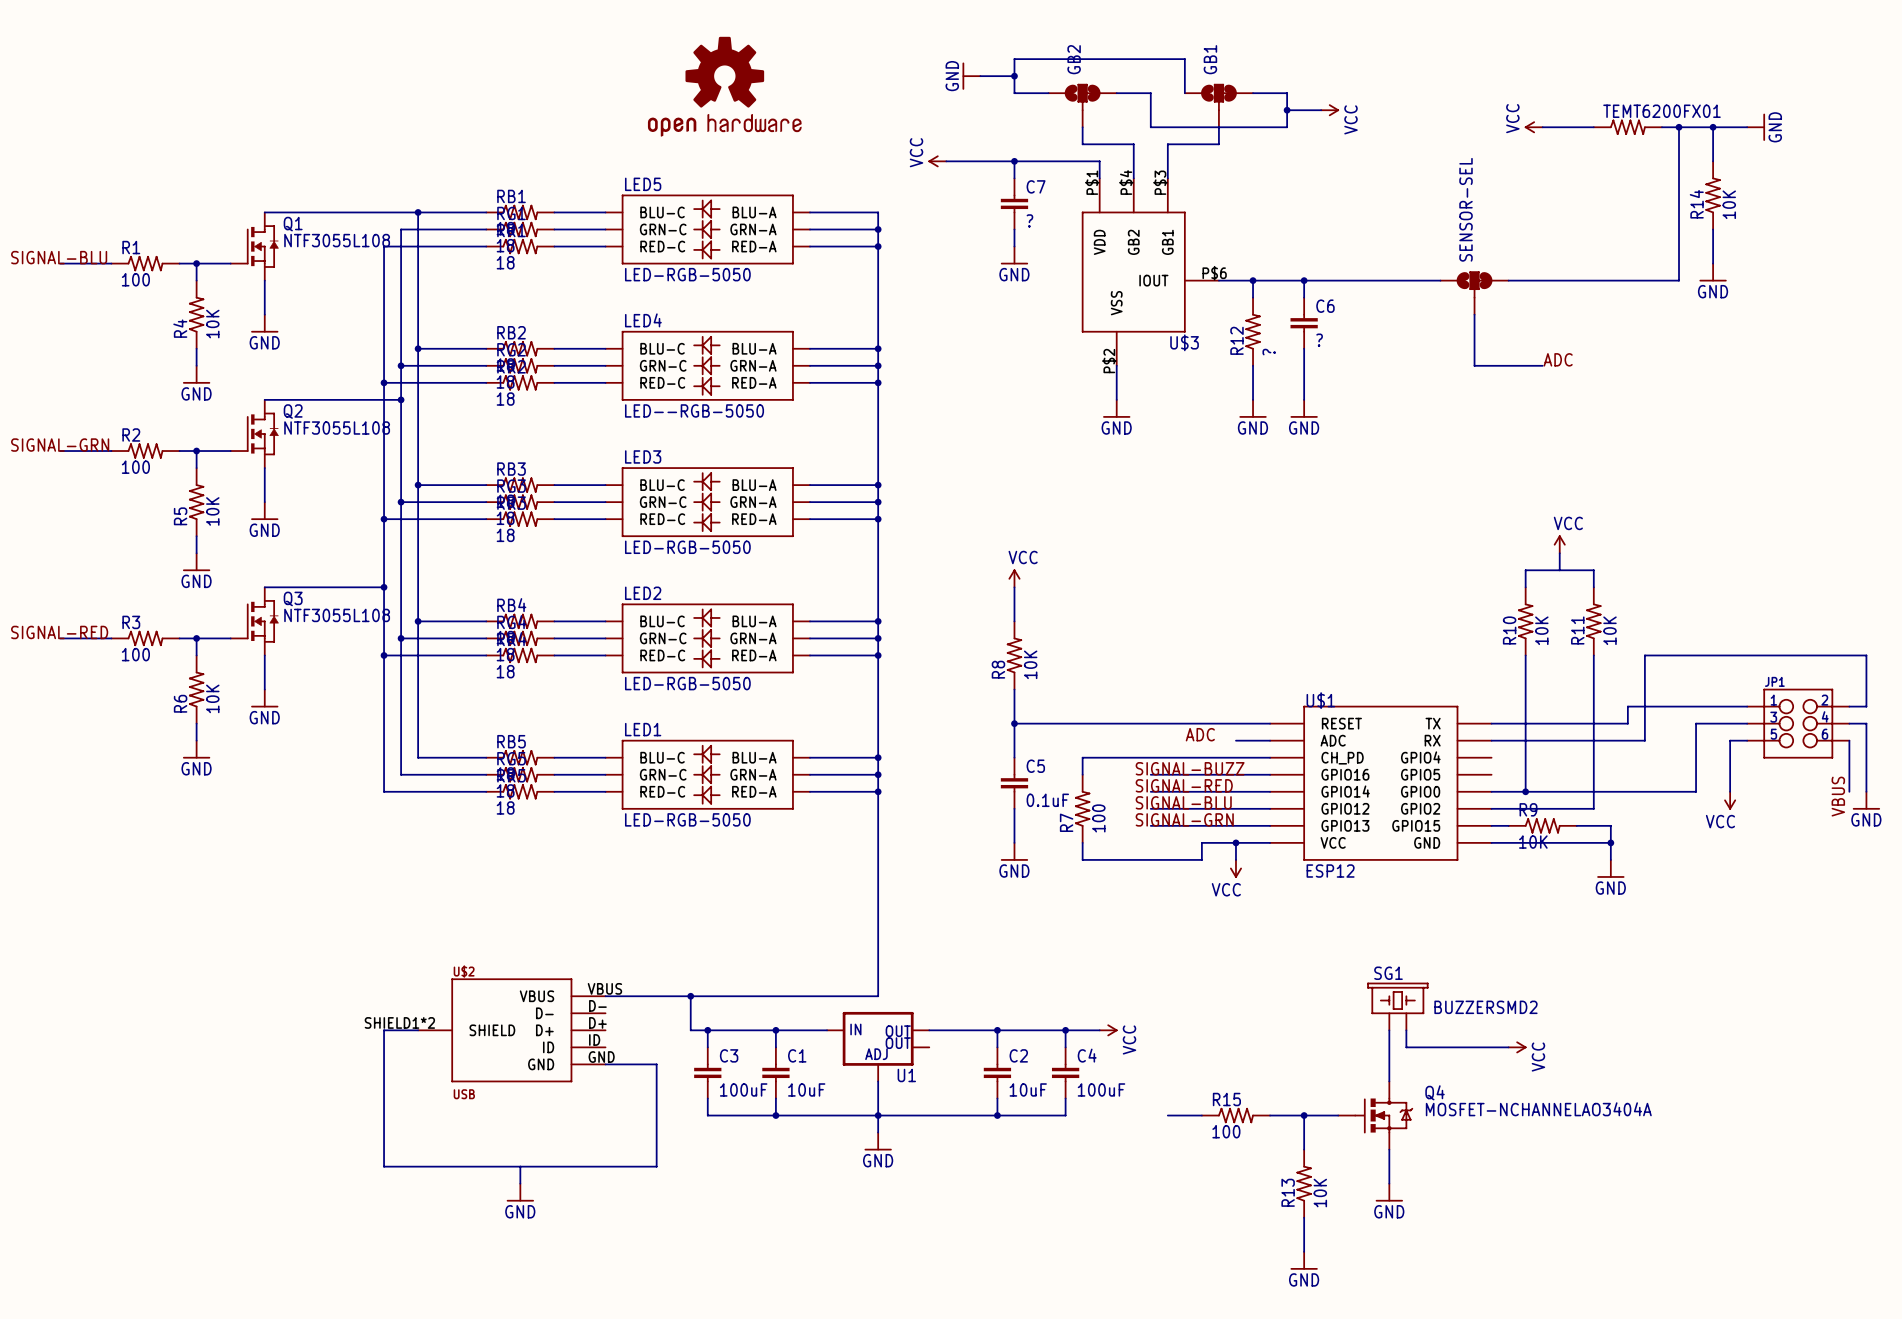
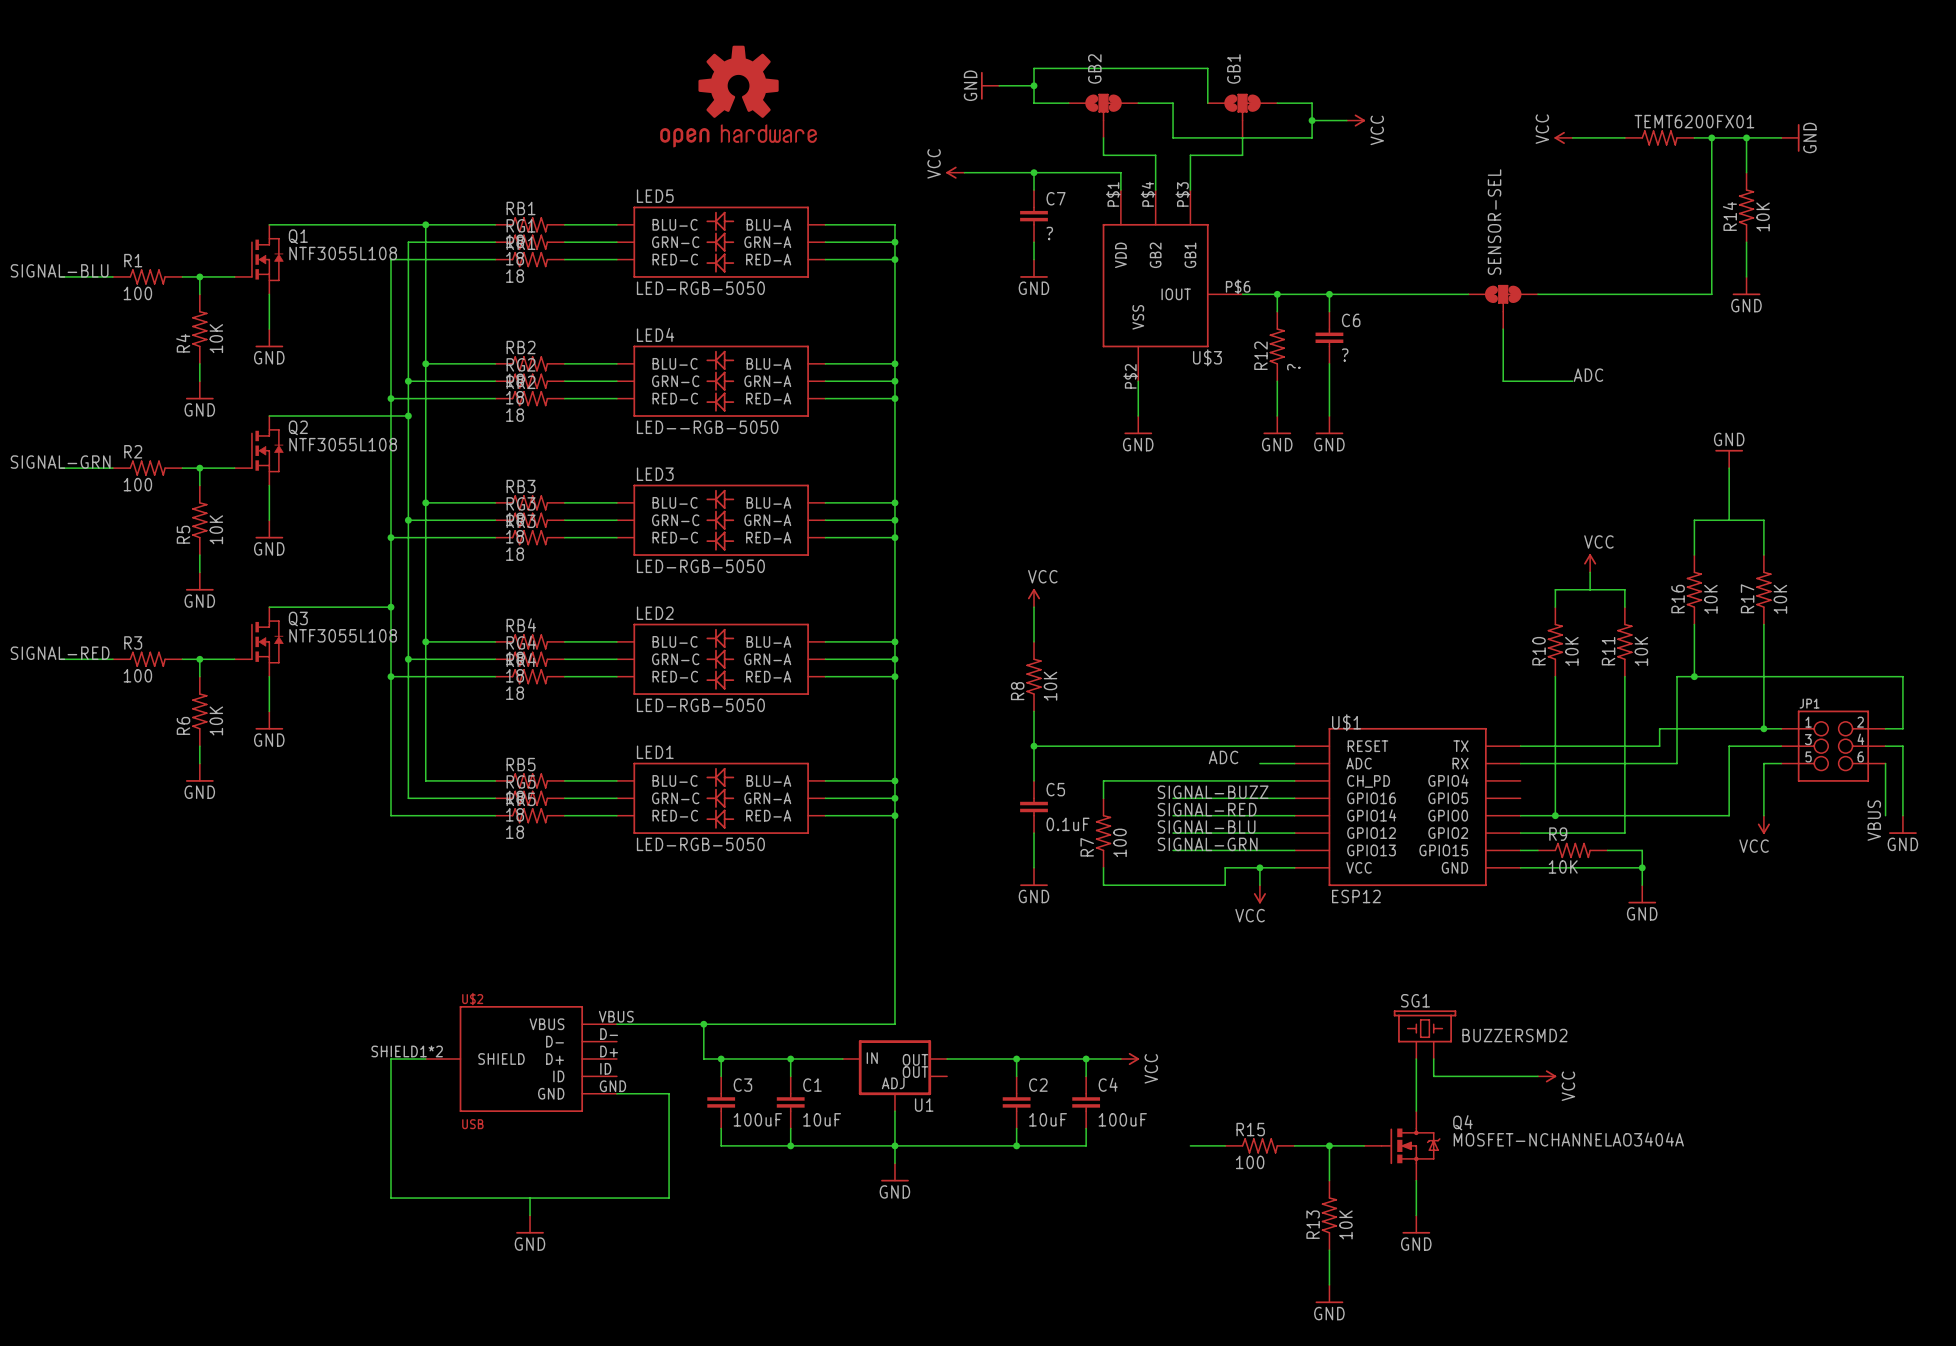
power symbol: none -> GND (1729, 459)
wire: none -> (1729, 468) (1729, 520)
wire: none -> (1694, 555) (1694, 520) (1763, 520) (1763, 555)
R16: none -> 10K (1694, 589)
R17: none -> 10K (1763, 589)
wire: none -> (1694, 624) (1694, 676)
wire: none -> (1763, 624) (1763, 728)
junction: none -> (1694, 676)
junction: none -> (1763, 728)

